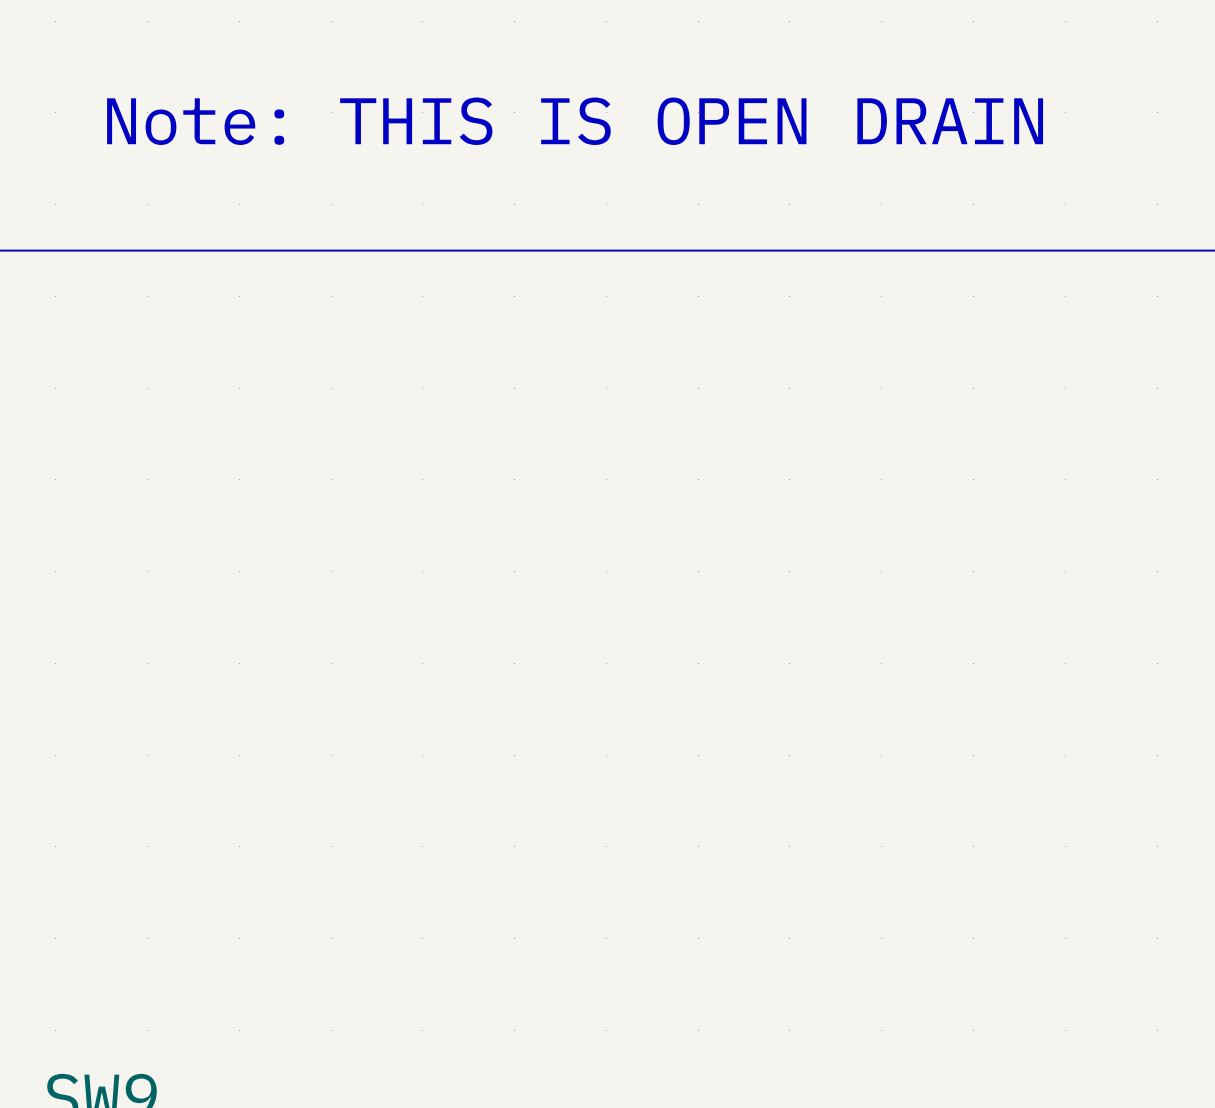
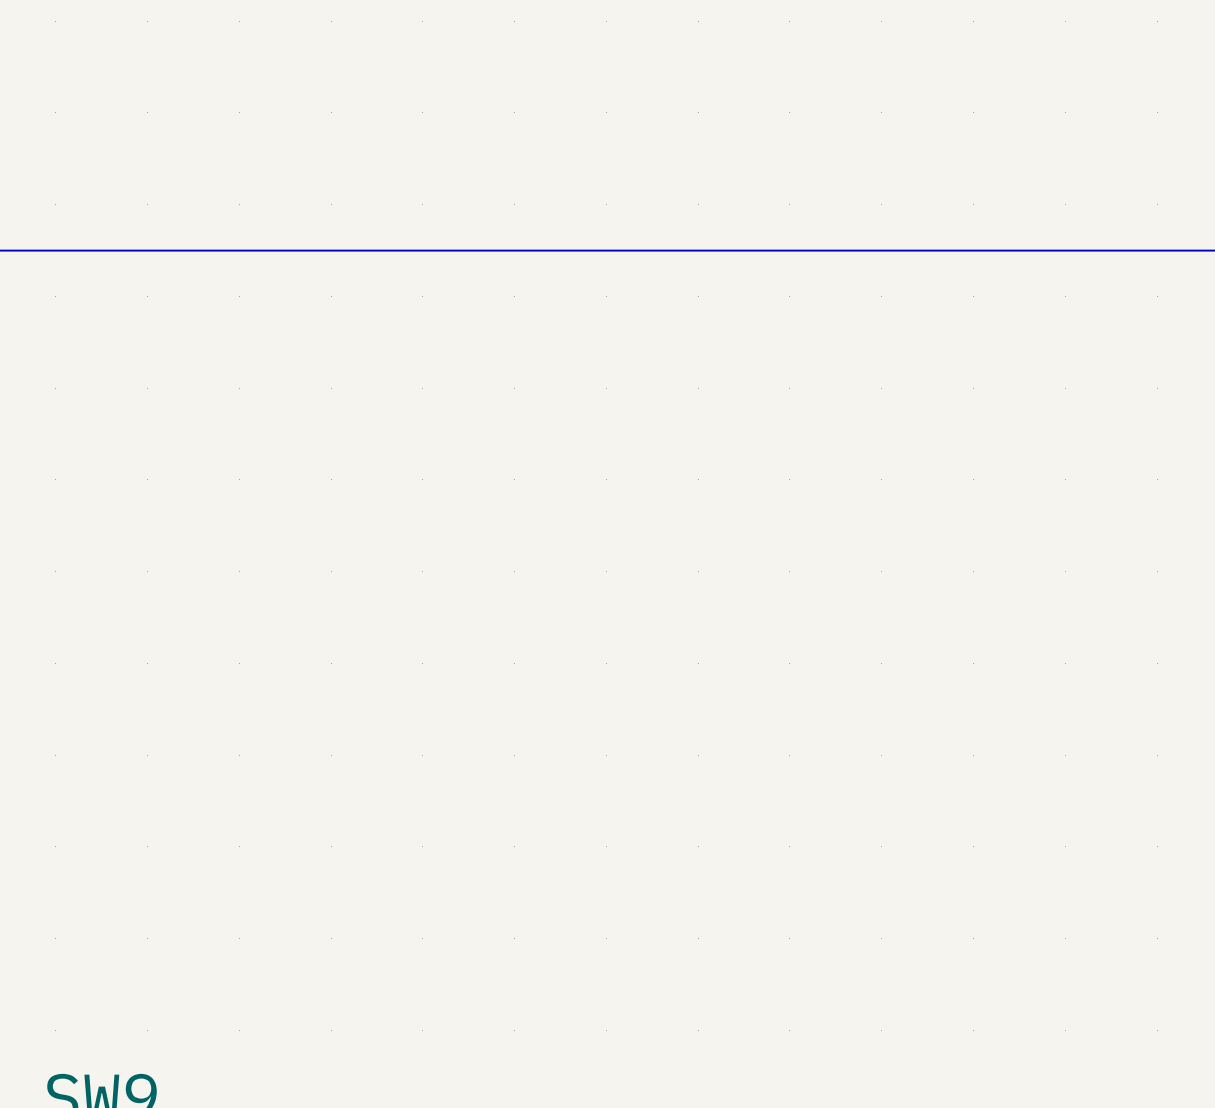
text: Note: THIS IS OPEN DRAIN (575, 121) -> none

